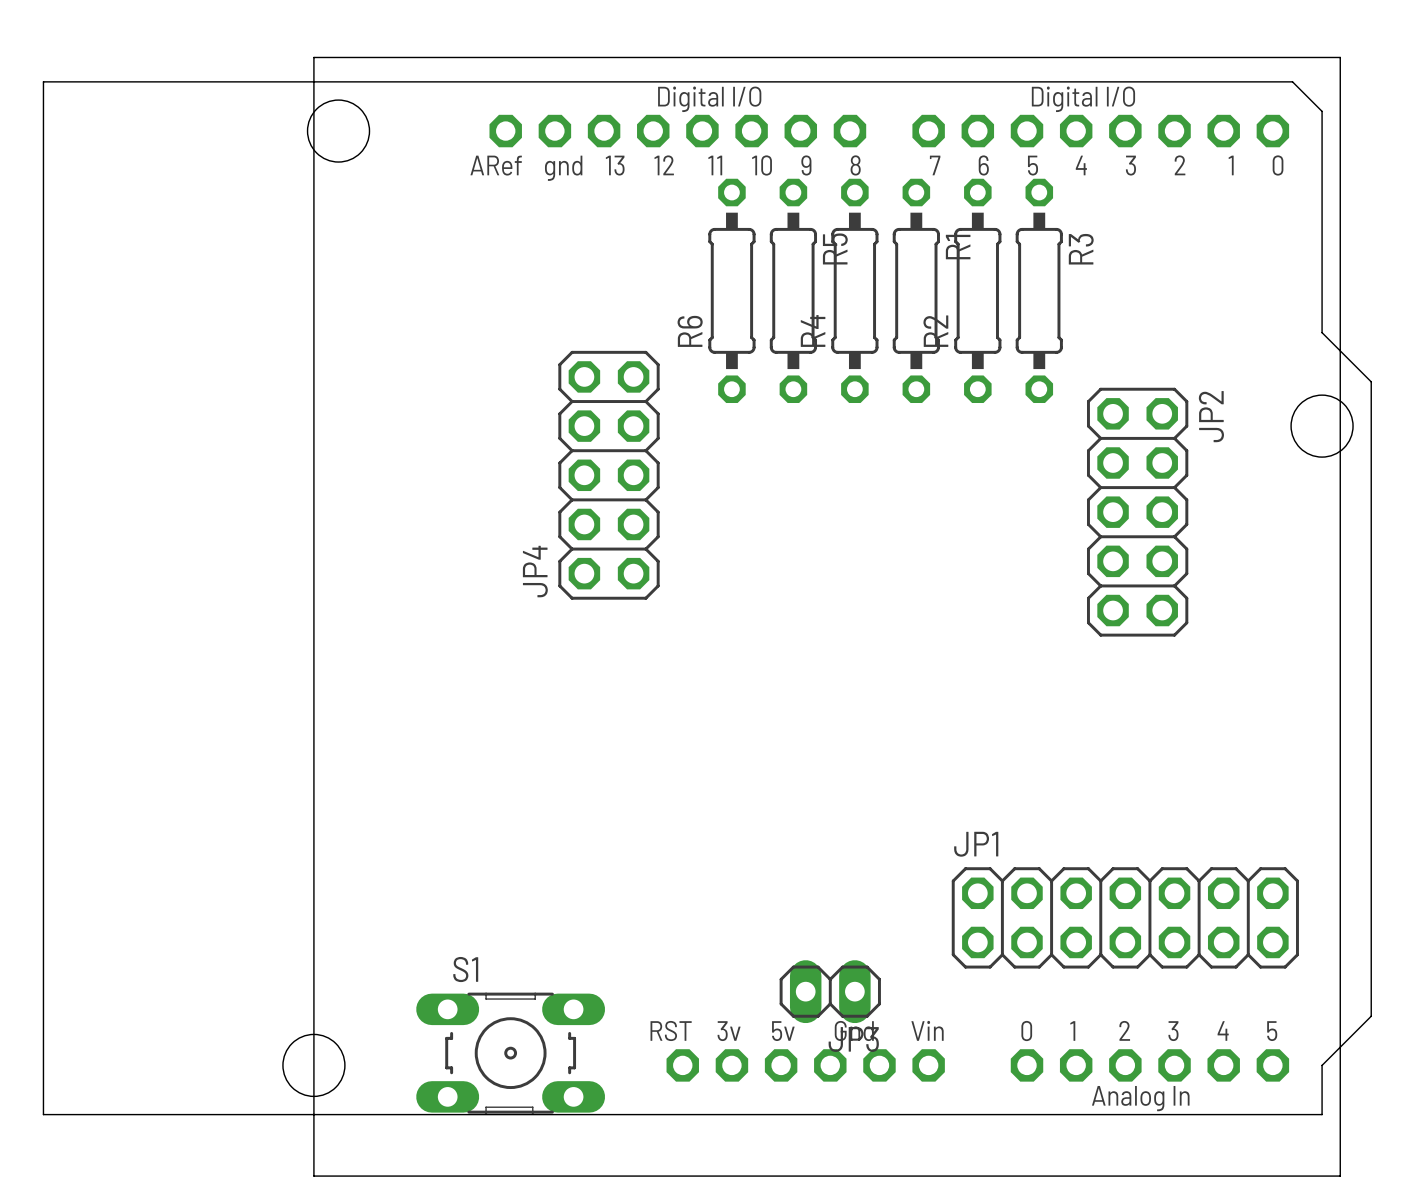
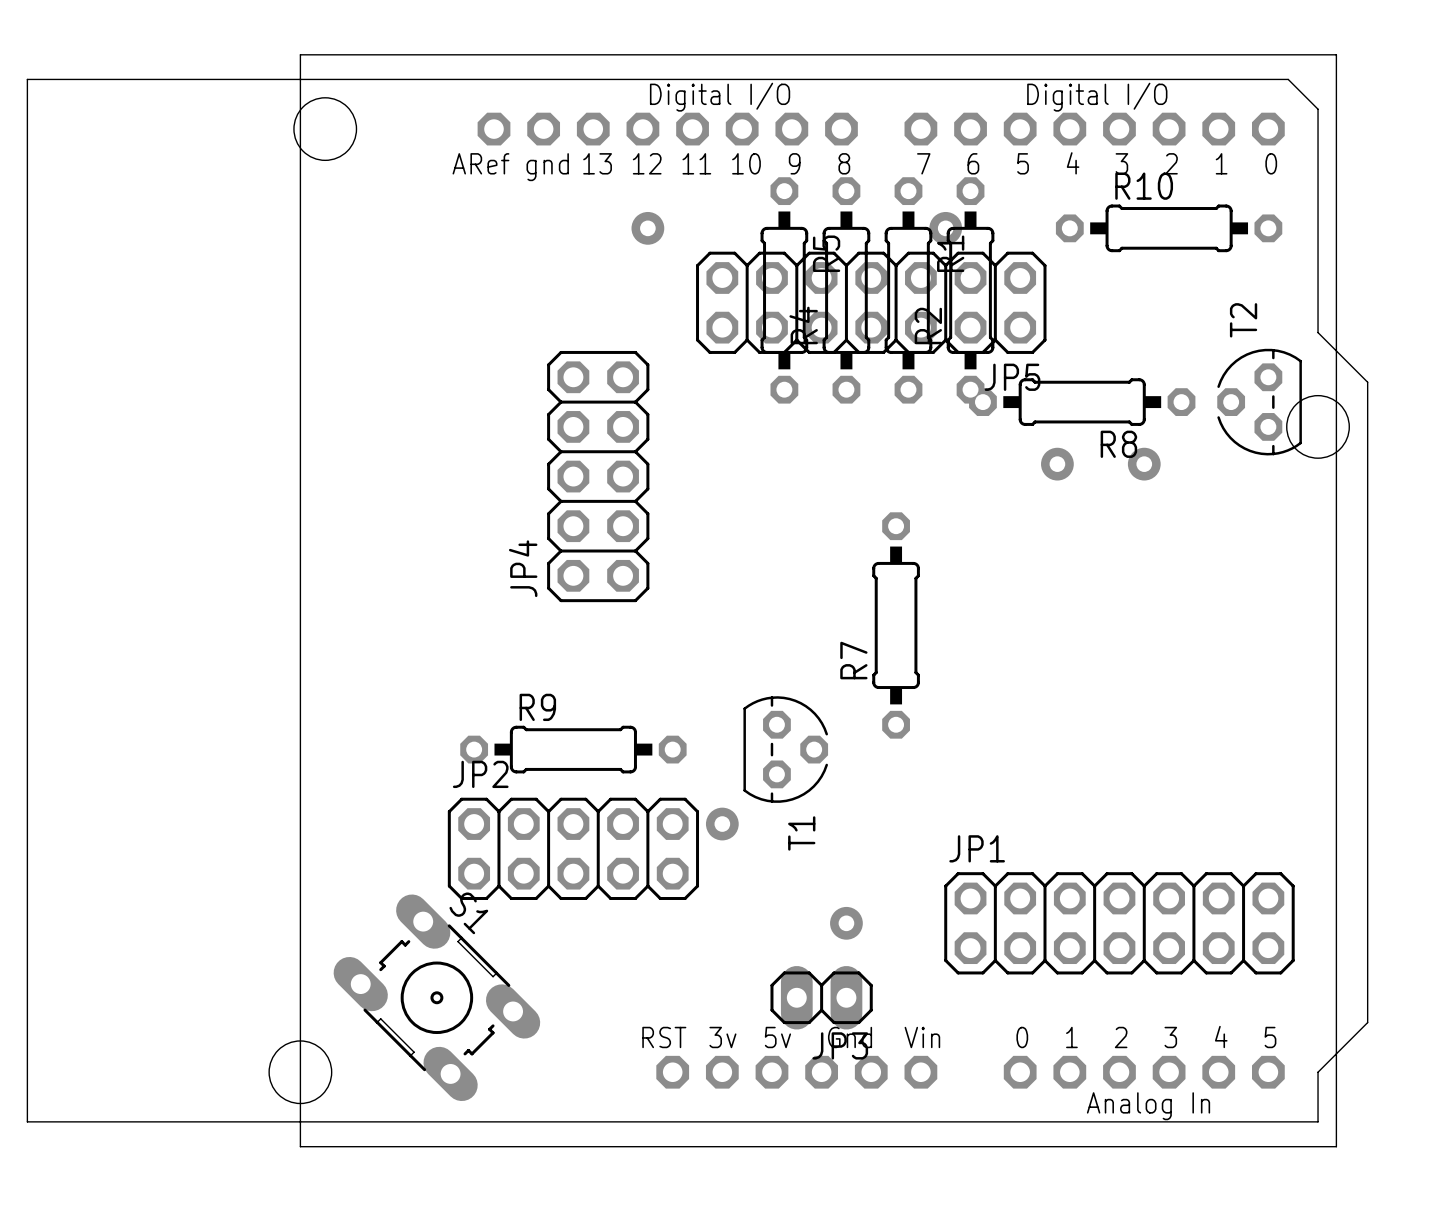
via: none -> (647, 228)
via: none -> (945, 228)
R10: none -> (1169, 228)
R6: (731, 290) -> none
R3: (1039, 290) -> none
JP5: none -> (871, 302)
R8: none -> (1082, 402)
T2: none -> (1259, 402)
JP2 name position: JP2 (1211, 416) -> JP2 (480, 774)
via: none -> (1057, 464)
via: none -> (1144, 464)
JP2 rotation: 0° (1137, 512) -> 90° clockwise (573, 848)
JP2 position: (1137, 512) -> (573, 848)
R7: none -> (896, 625)
R9: none -> (573, 749)
T1: none -> (785, 749)
via: none -> (722, 824)
via: none -> (846, 923)
S1 rotation: 0° (510, 1053) -> 45° clockwise (436, 997)
board edge: (313, 1139) (313, 1176) (1340, 1176) (1340, 1139) -> (300, 1146) (1336, 1146)

